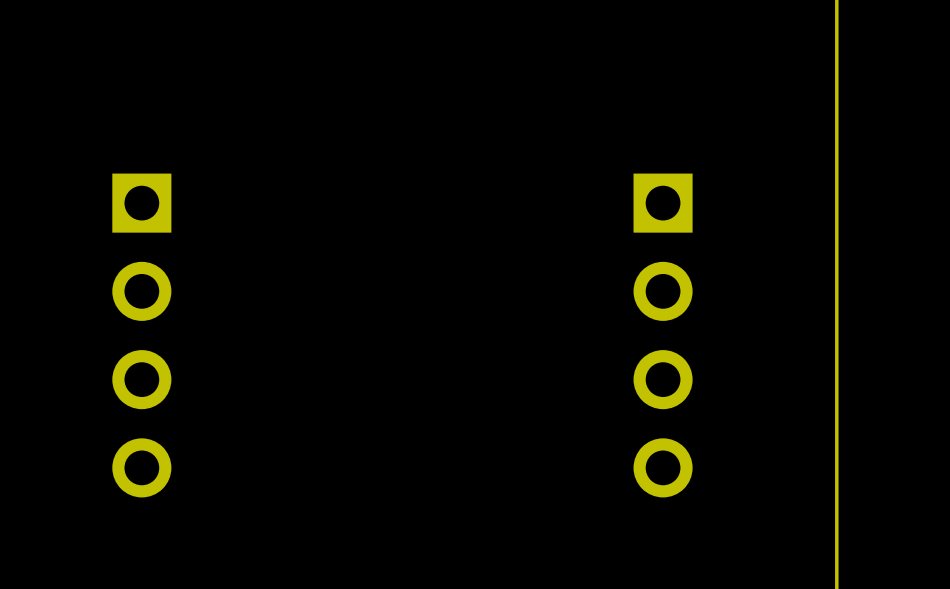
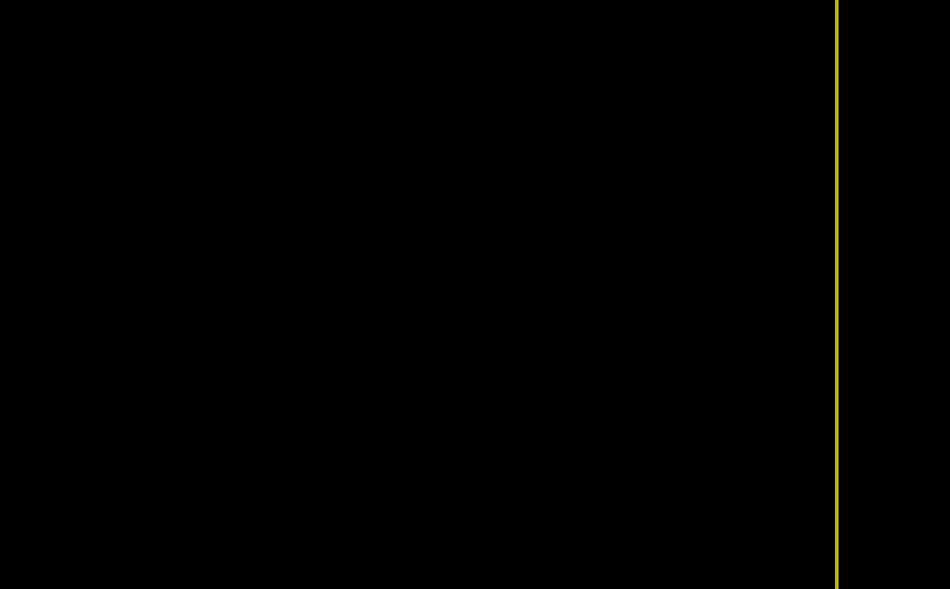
part: (141, 335) -> none
part: (663, 335) -> none

